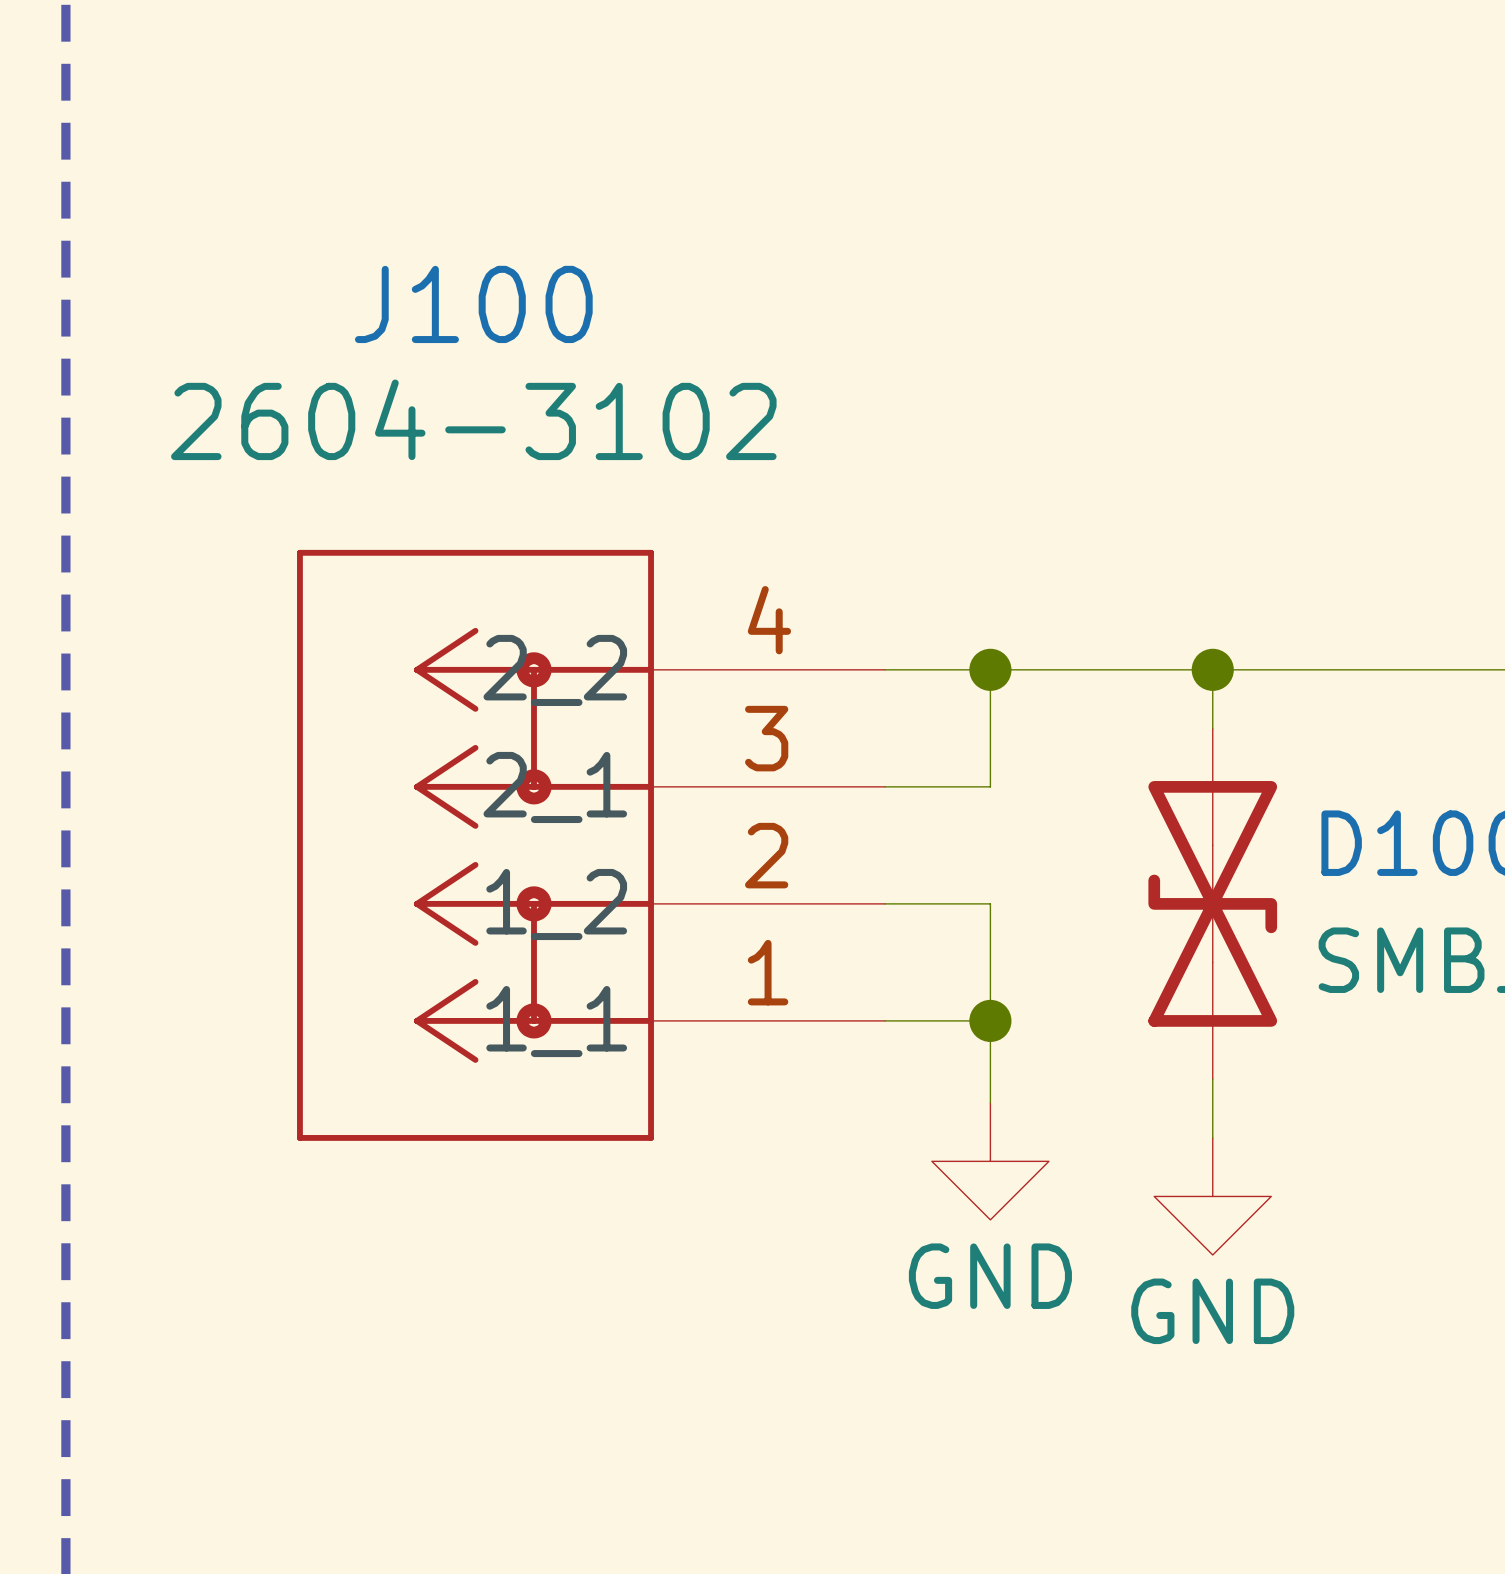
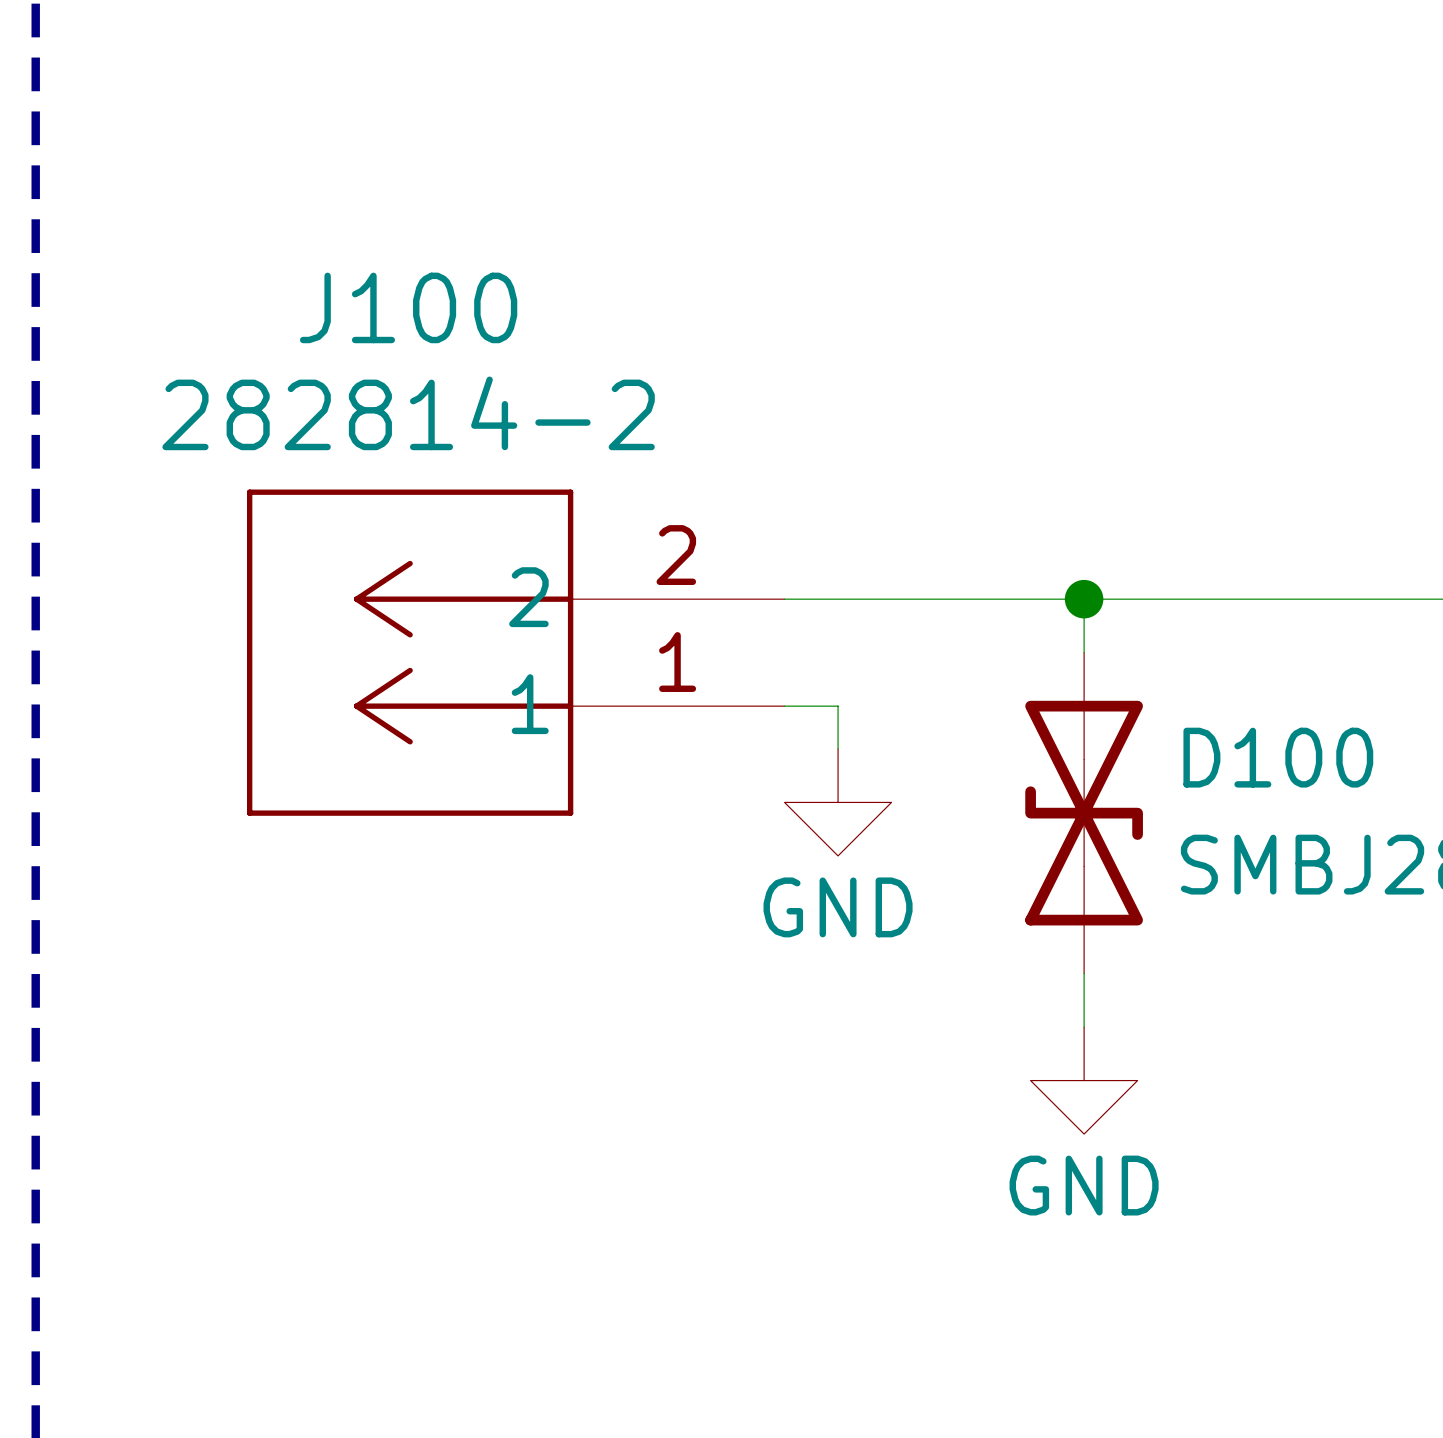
J100 name position: J100 (473, 304) -> J100 (408, 307)
J100 value: 2604-3102 (473, 419) -> 282814-2 (408, 413)
J100 symbol: [297, 549, 886, 1141] -> [246, 489, 785, 816]
wire: (990, 669) (990, 786) (943, 786) -> (838, 748) (838, 706)
junction: (990, 669) -> none
wire: (885, 903) (990, 903) (990, 1102) -> none
wire: (885, 1020) (990, 1020) -> none
junction: (990, 1020) -> none
power symbol position: GND (990, 1161) -> GND (838, 802)

